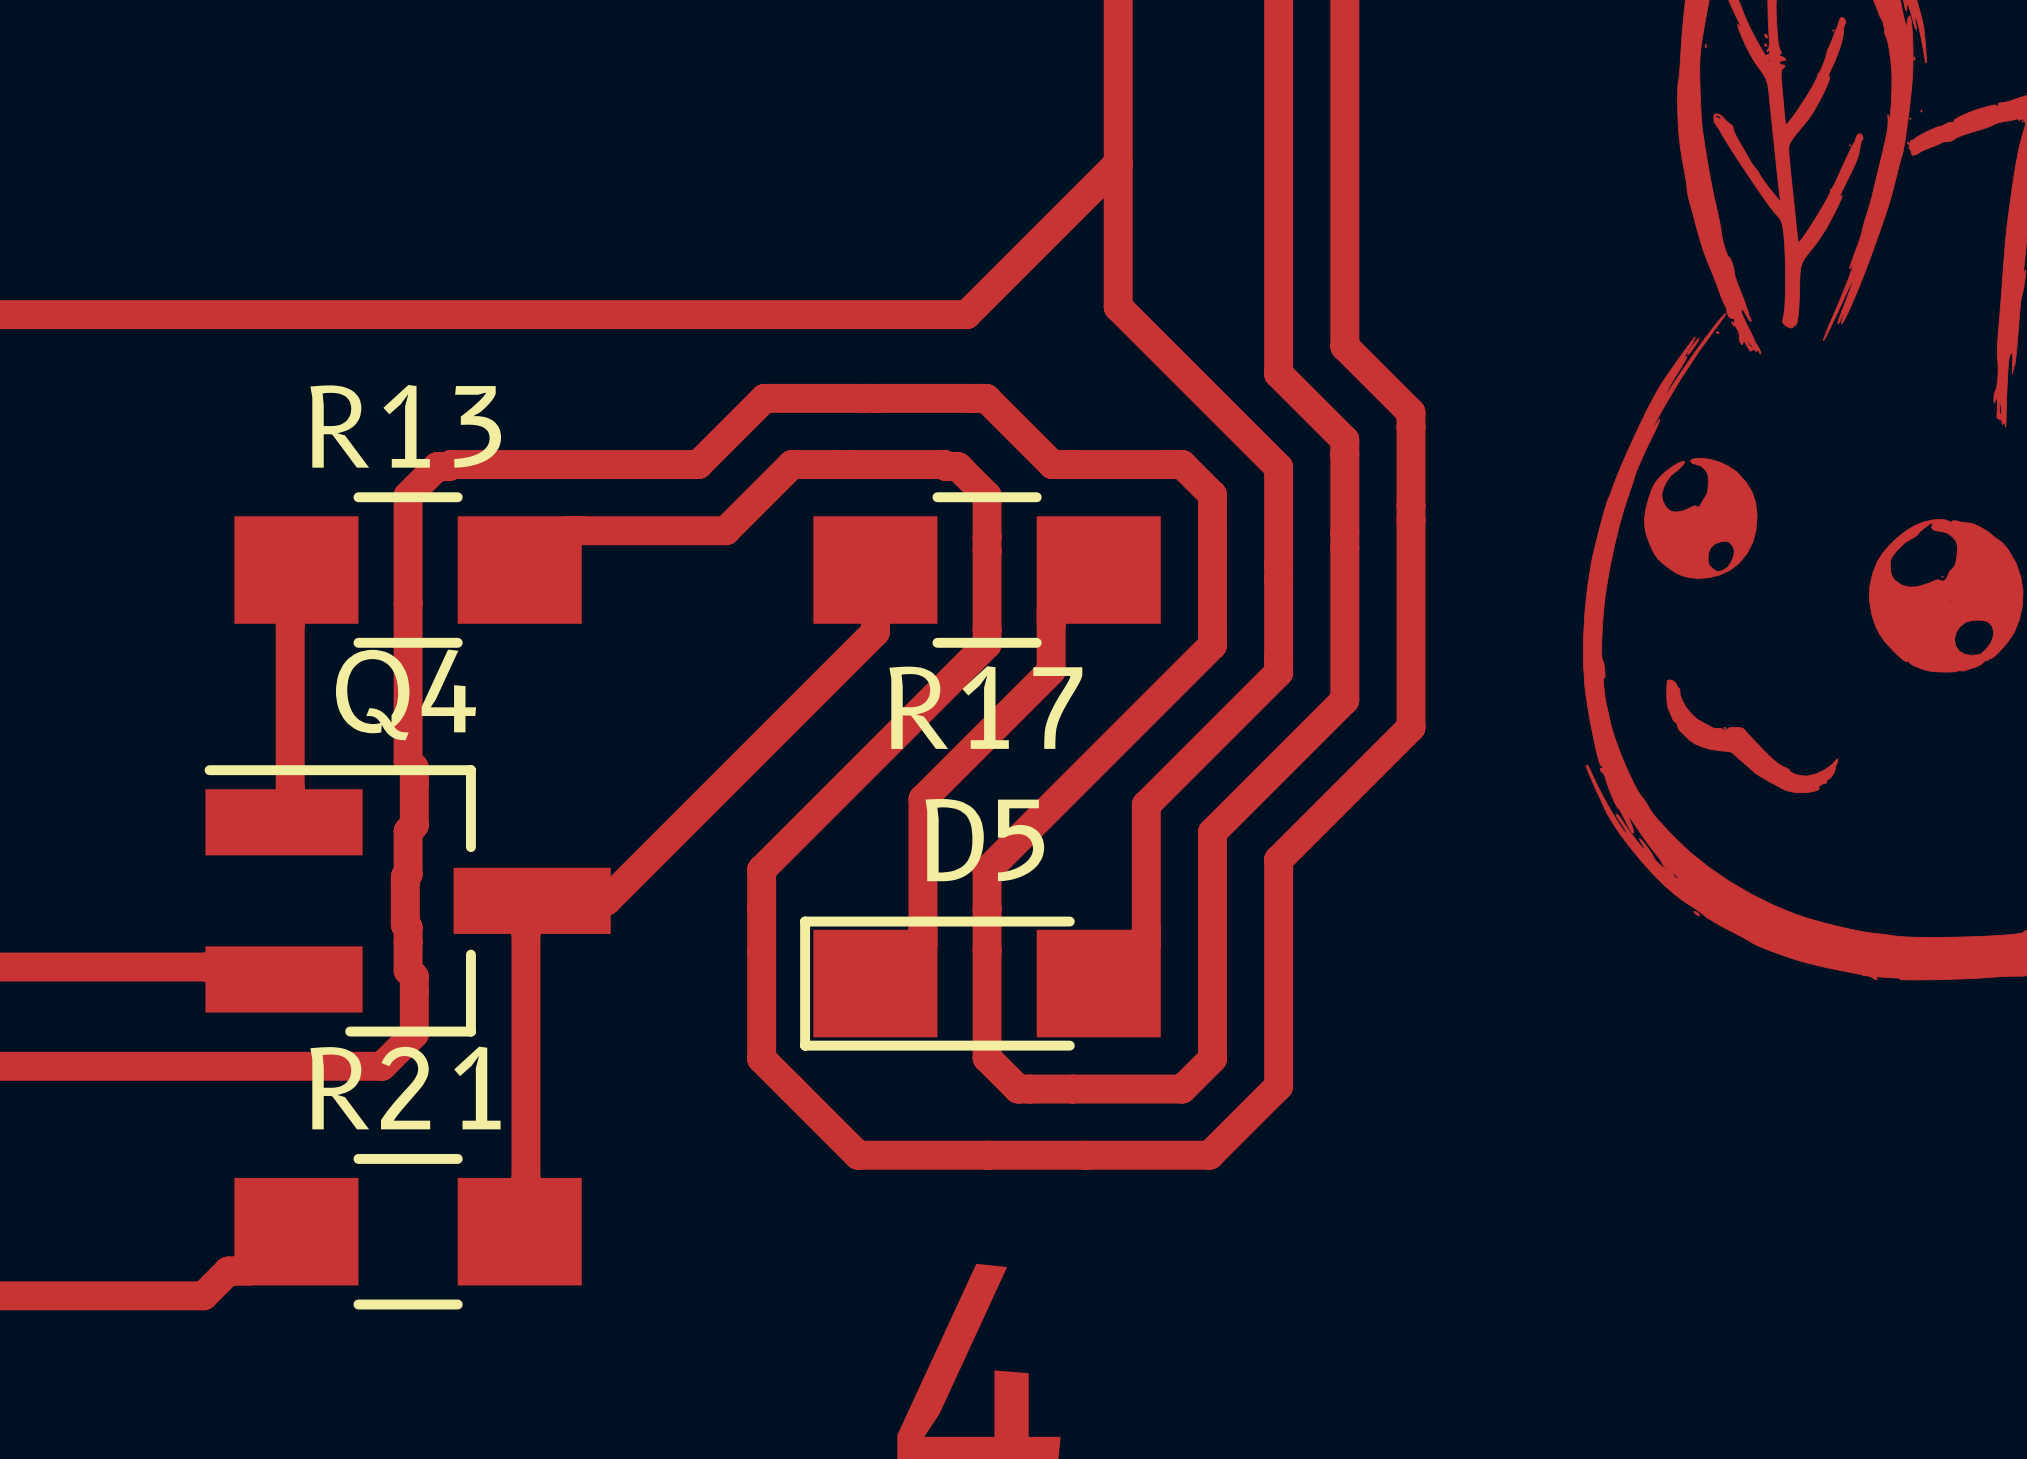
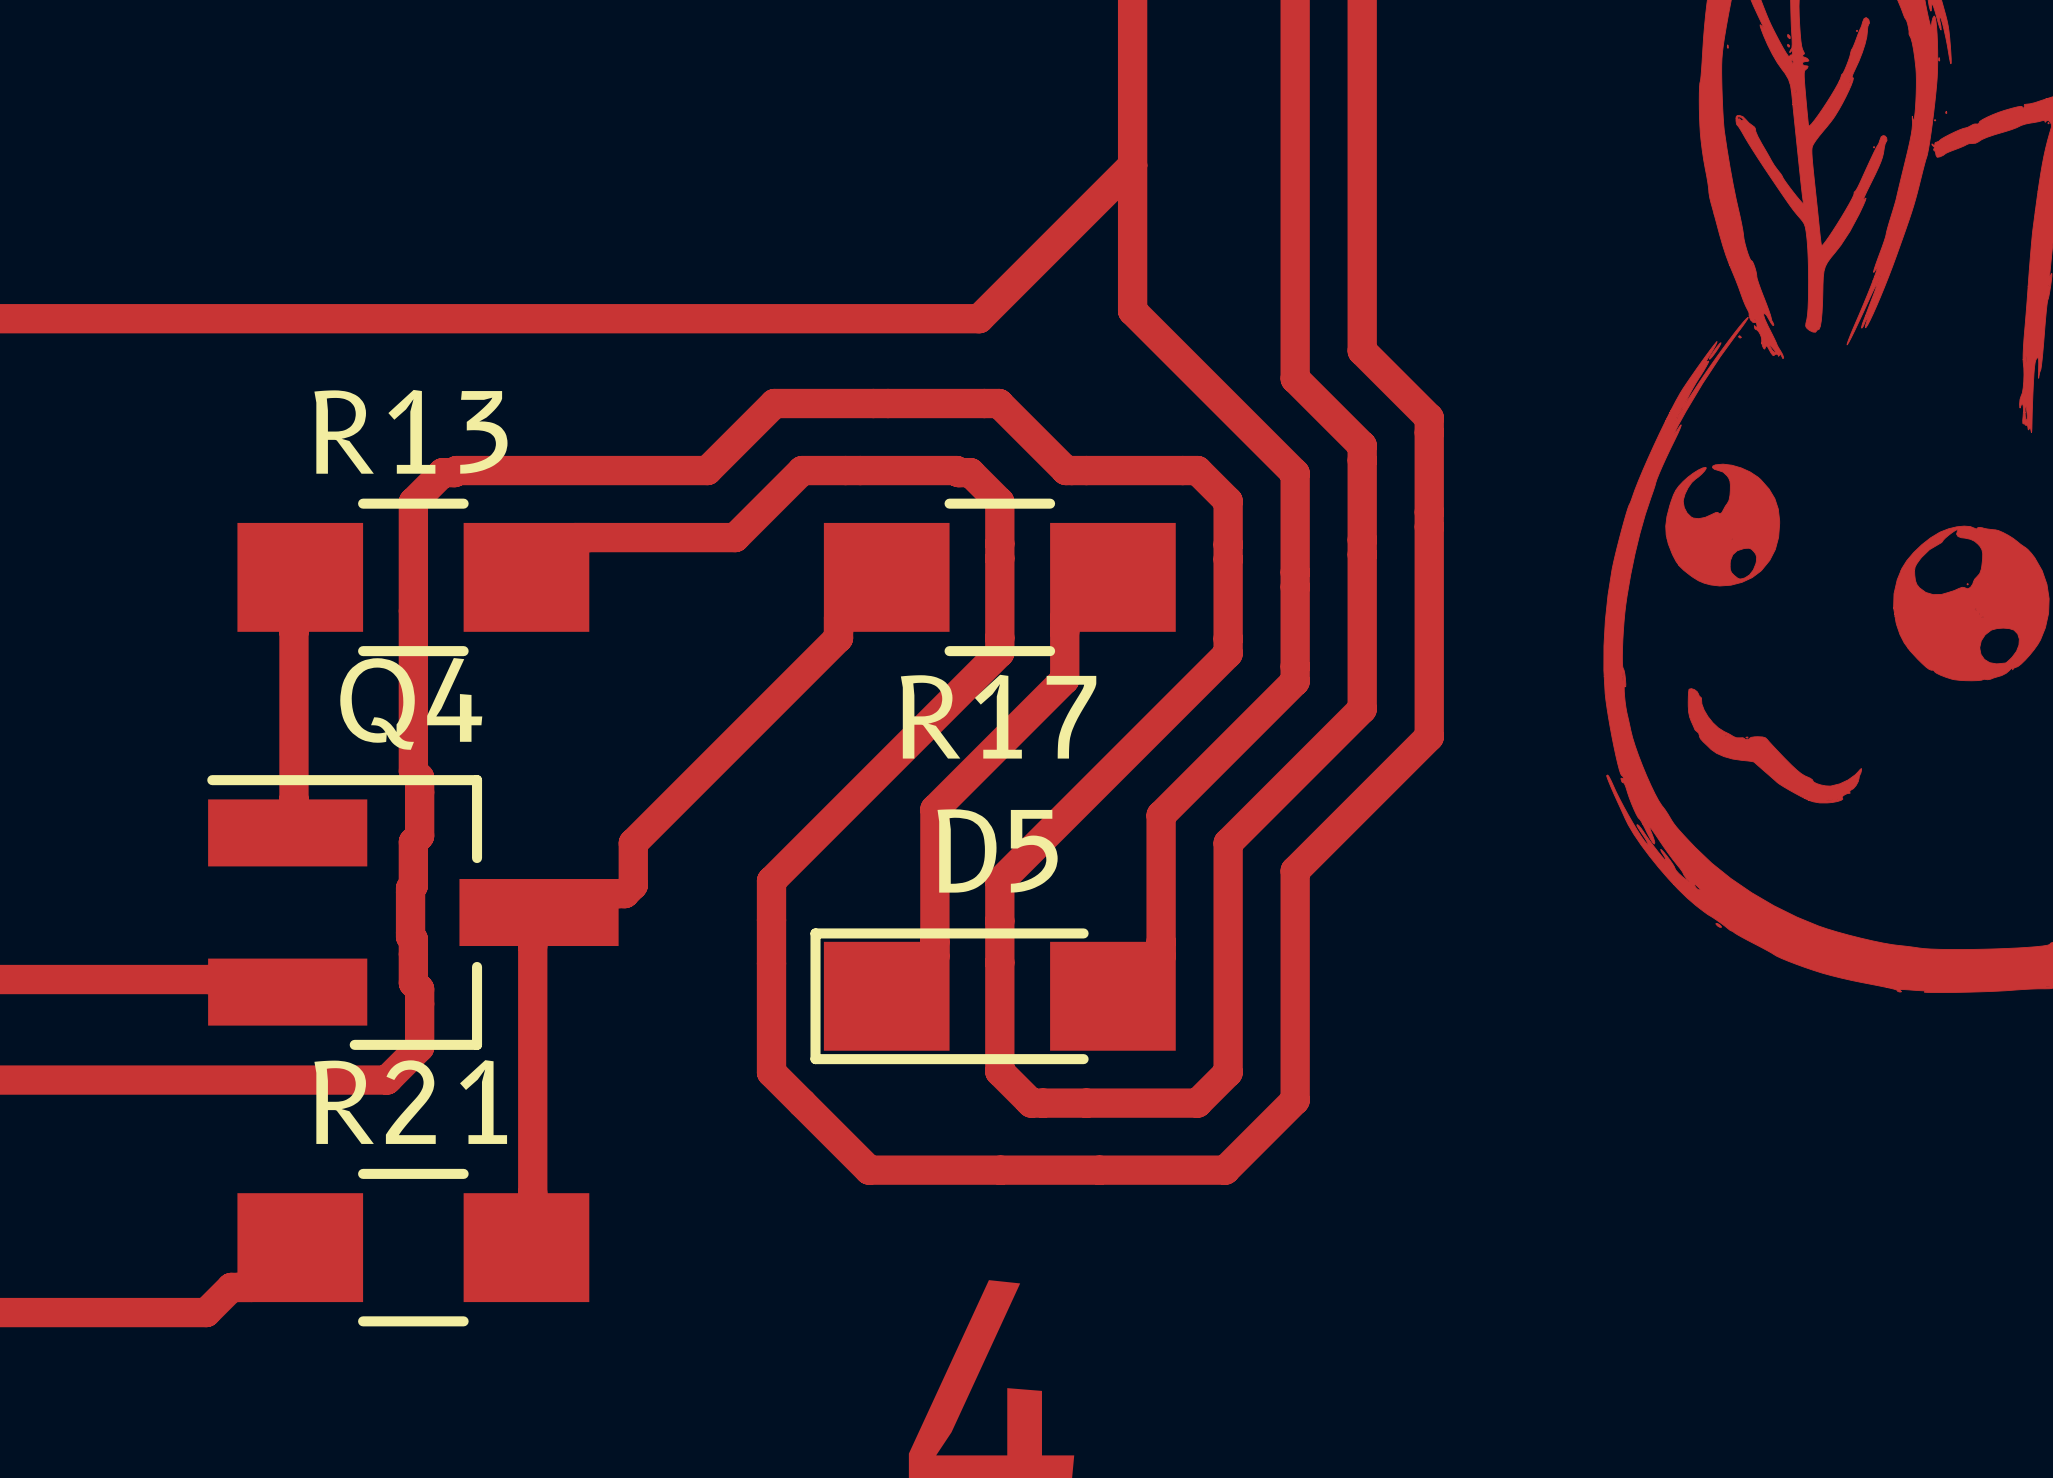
track: (875, 570) (875, 632) (606, 900) (532, 900) -> (886, 577) (838, 617) (838, 637) (633, 843) (633, 885) (624, 893) (603, 893) (539, 912)

